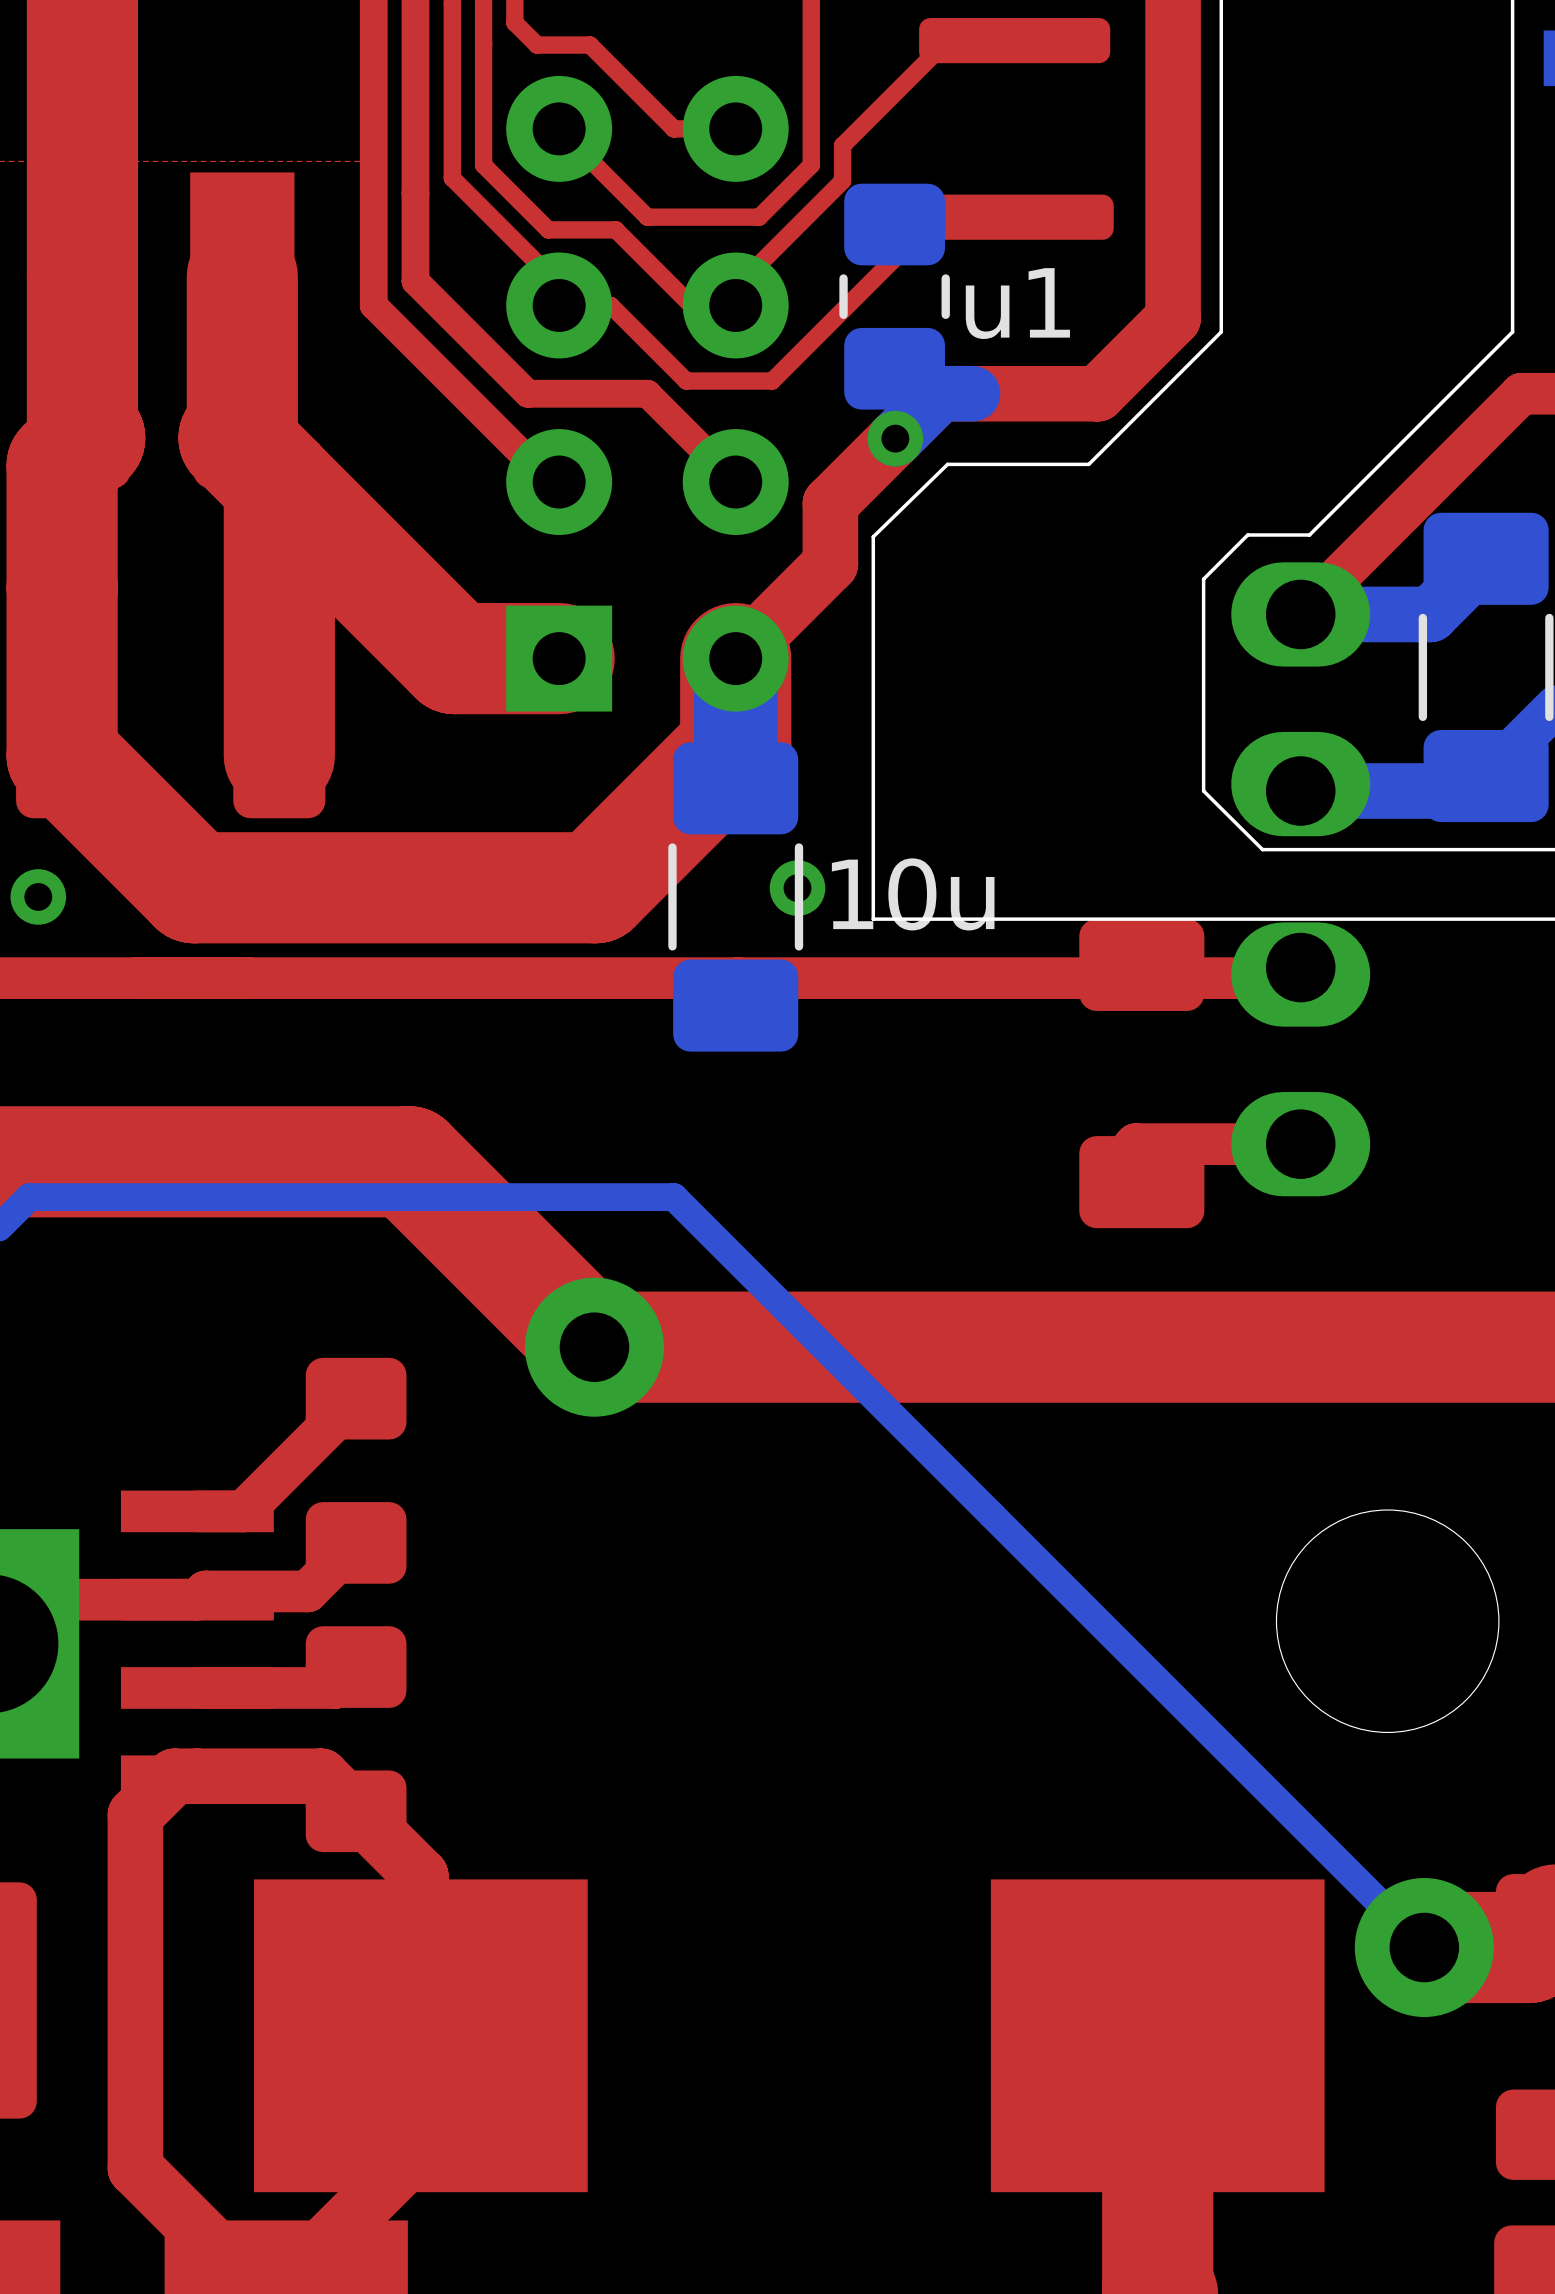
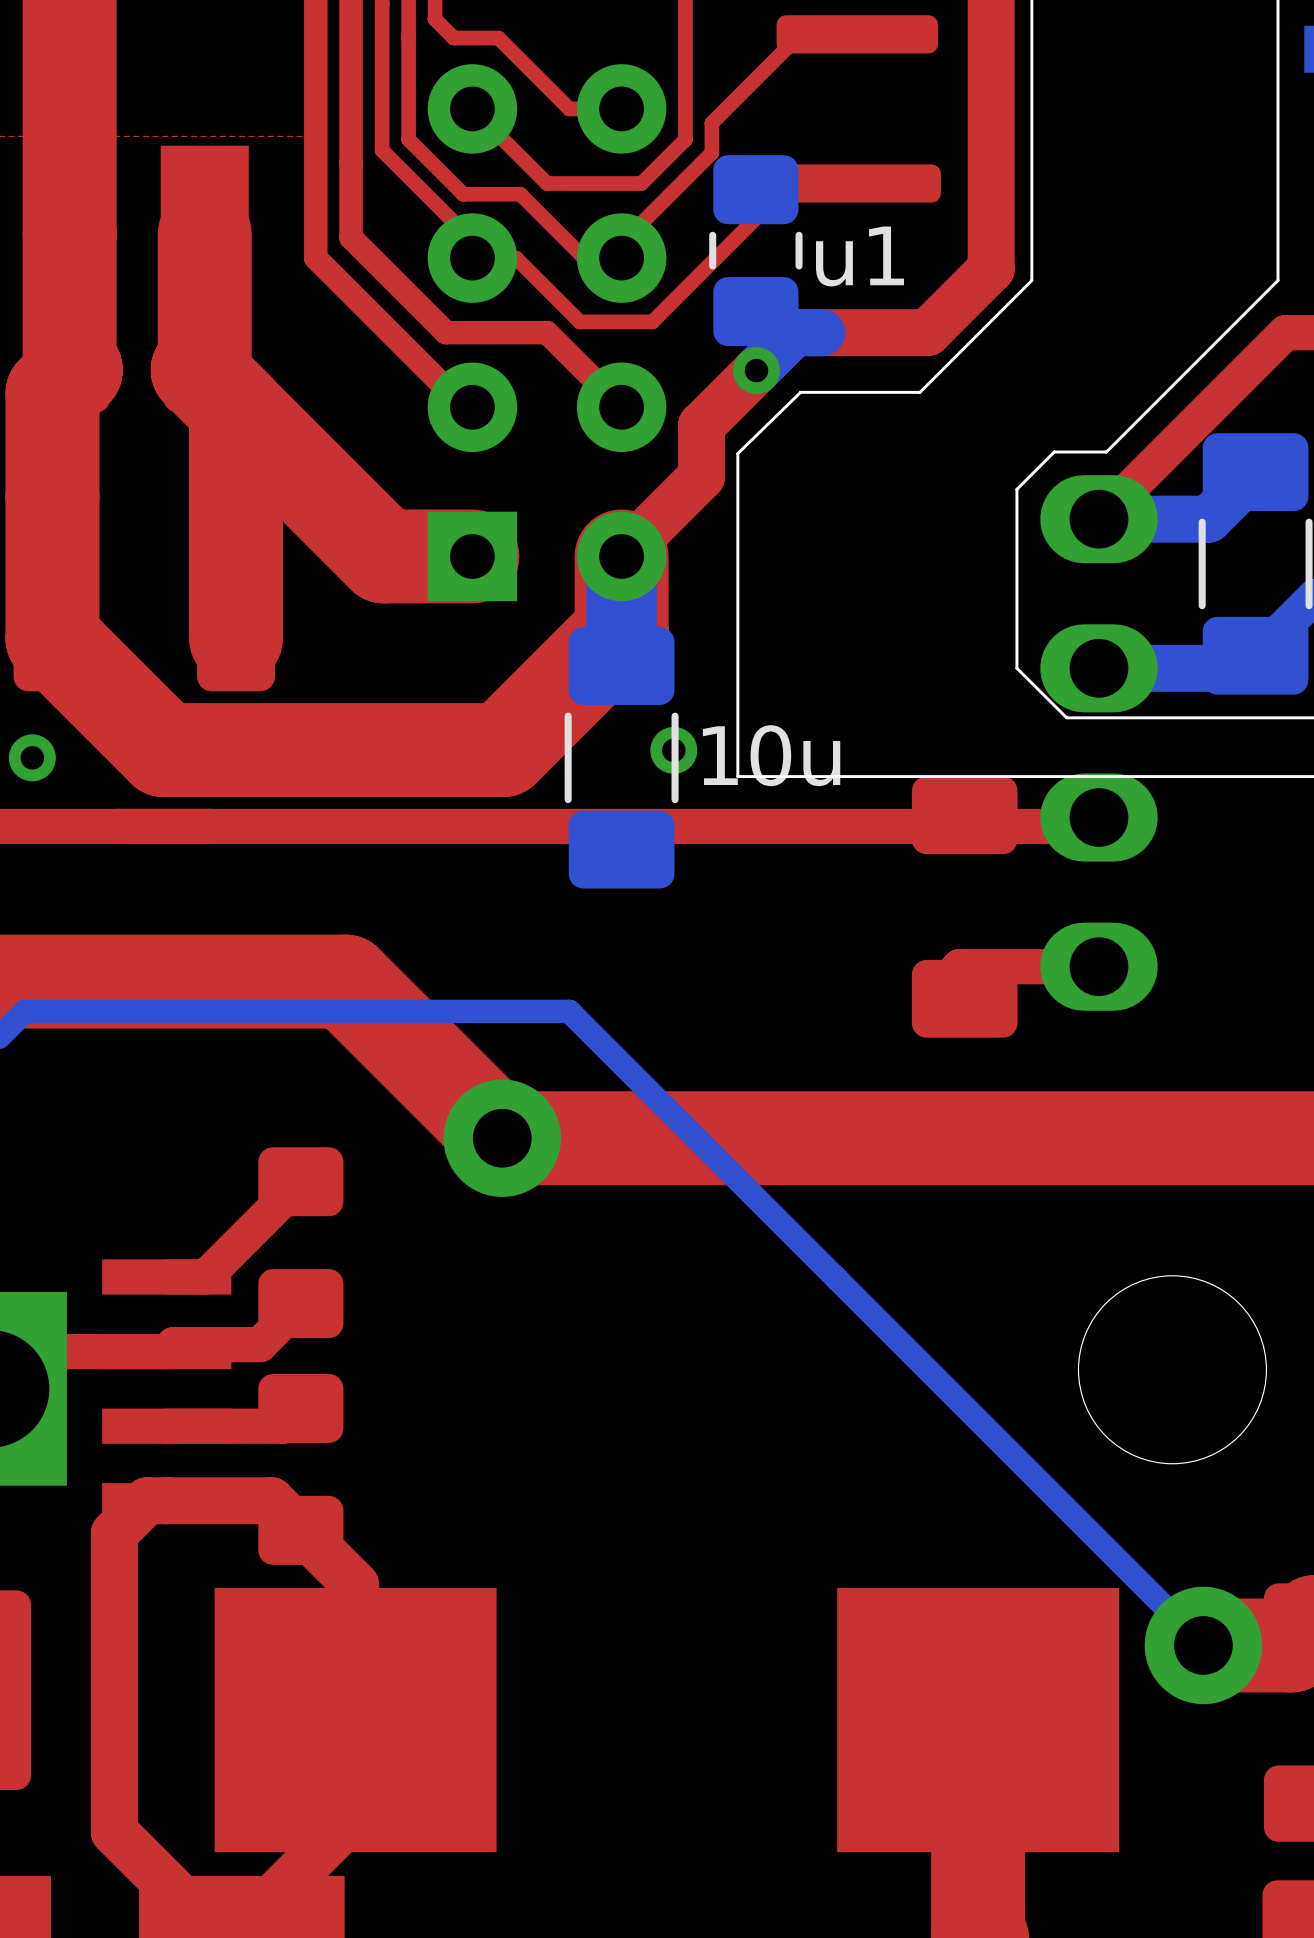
part footprint: [1231, 562, 1371, 1197] -> [1040, 475, 1158, 1011]

